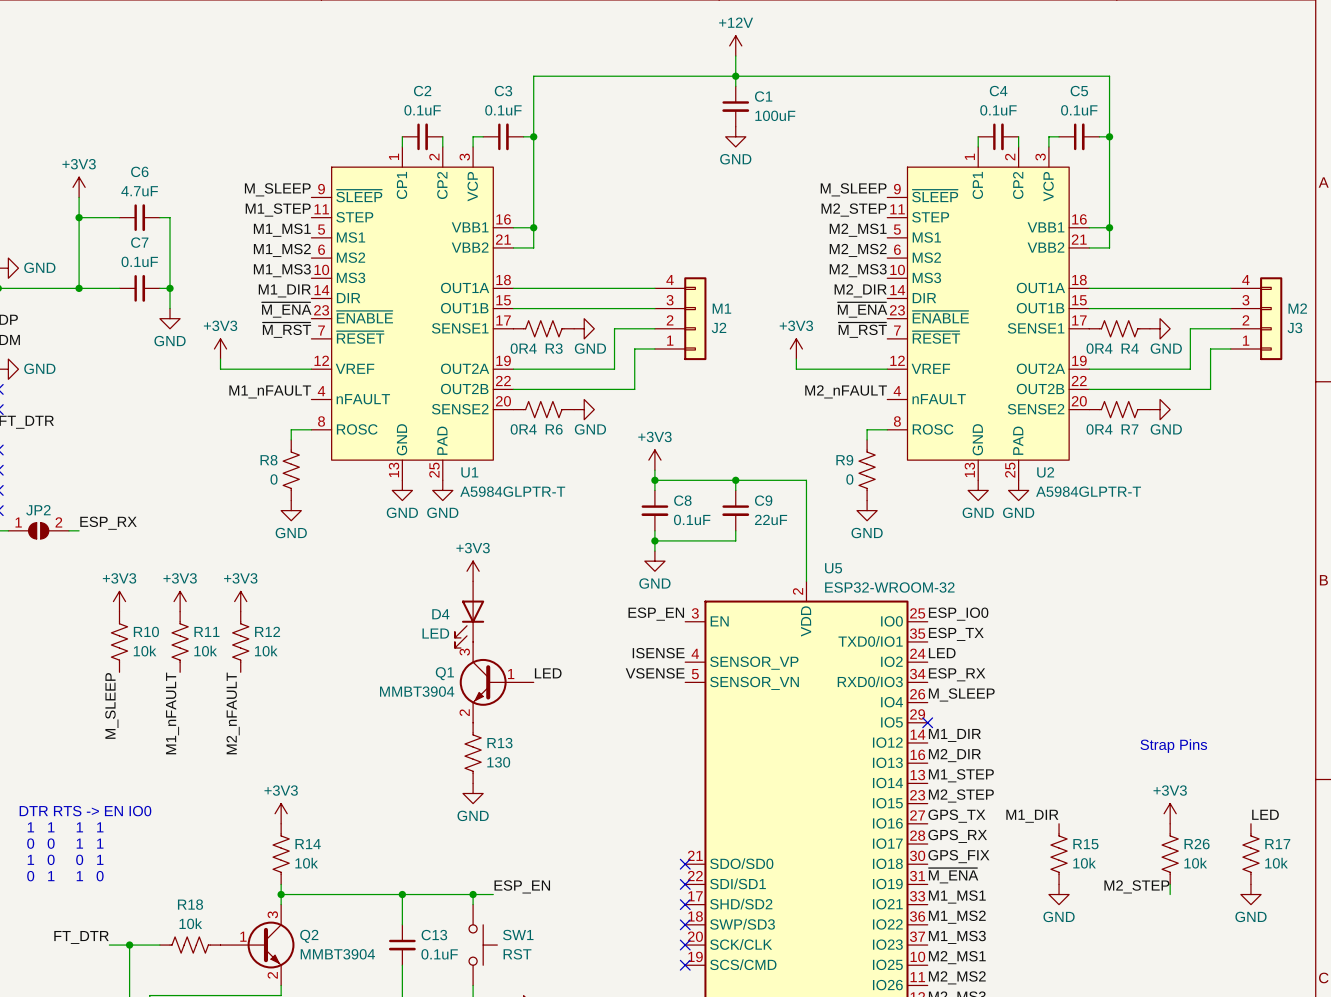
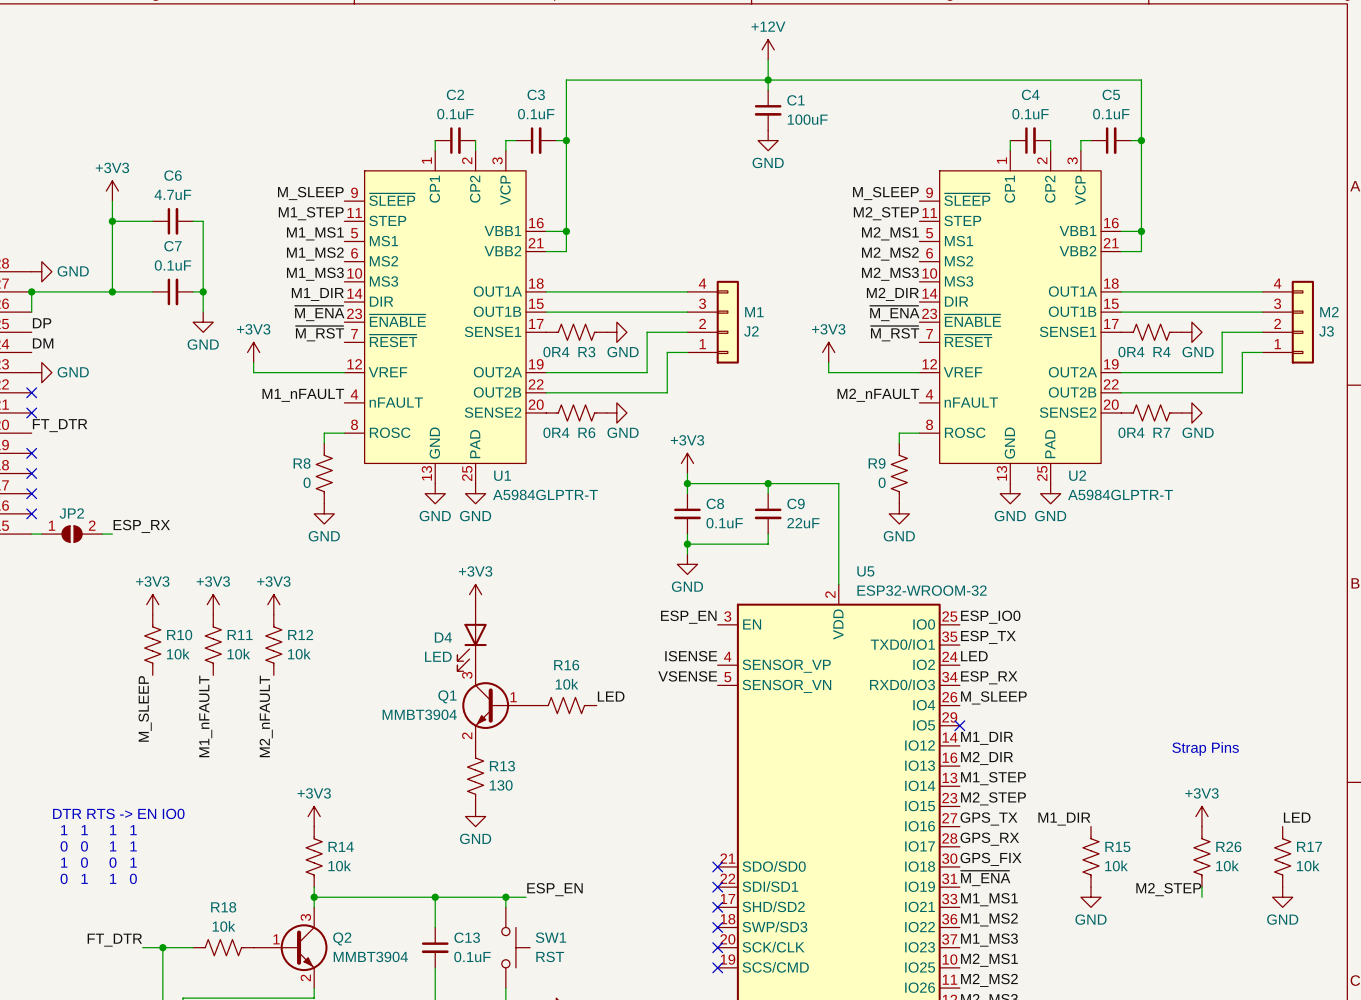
power symbol position: +3V3 (473, 571) -> +3V3 (475, 594)
D4 position: (469, 614) -> (472, 637)
label position: LED (548, 673) -> LED (611, 696)
Q1 position: (496, 682) -> (499, 705)
R16: none -> 10k (566, 705)
R13 position: (473, 753) -> (475, 776)
power symbol position: GND (473, 793) -> GND (475, 816)

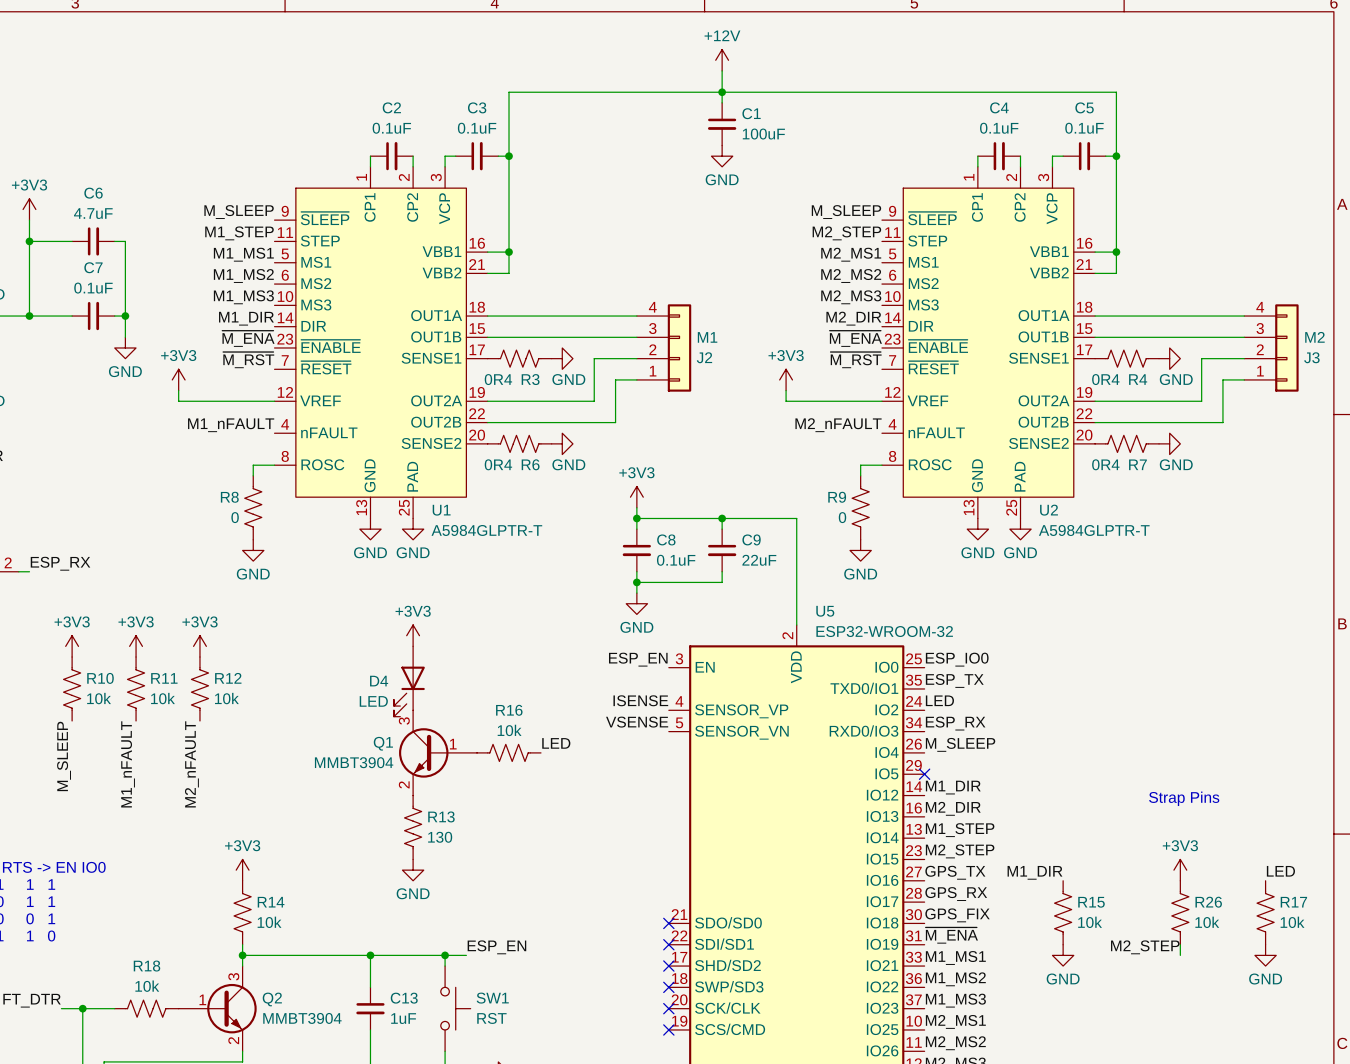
C13 value: 0.1uF (472, 956) -> 1uF (403, 1018)

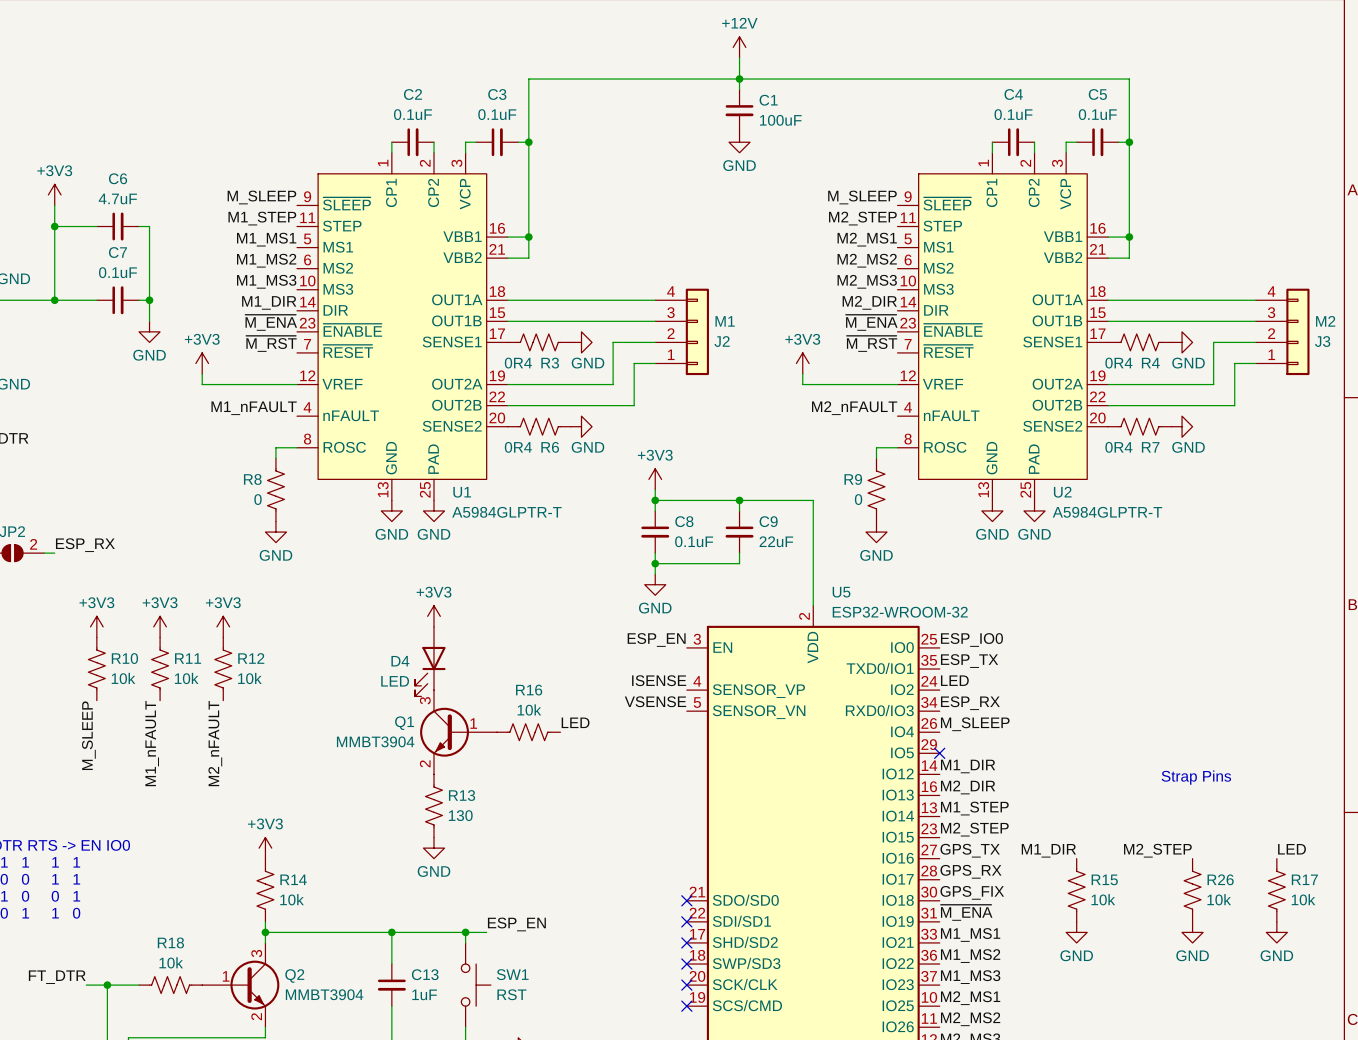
power symbol: +3V3 (1180, 870) -> none
label position: M2_STEP (1145, 947) -> M2_STEP (1157, 850)
power symbol: none -> GND (1192, 932)

